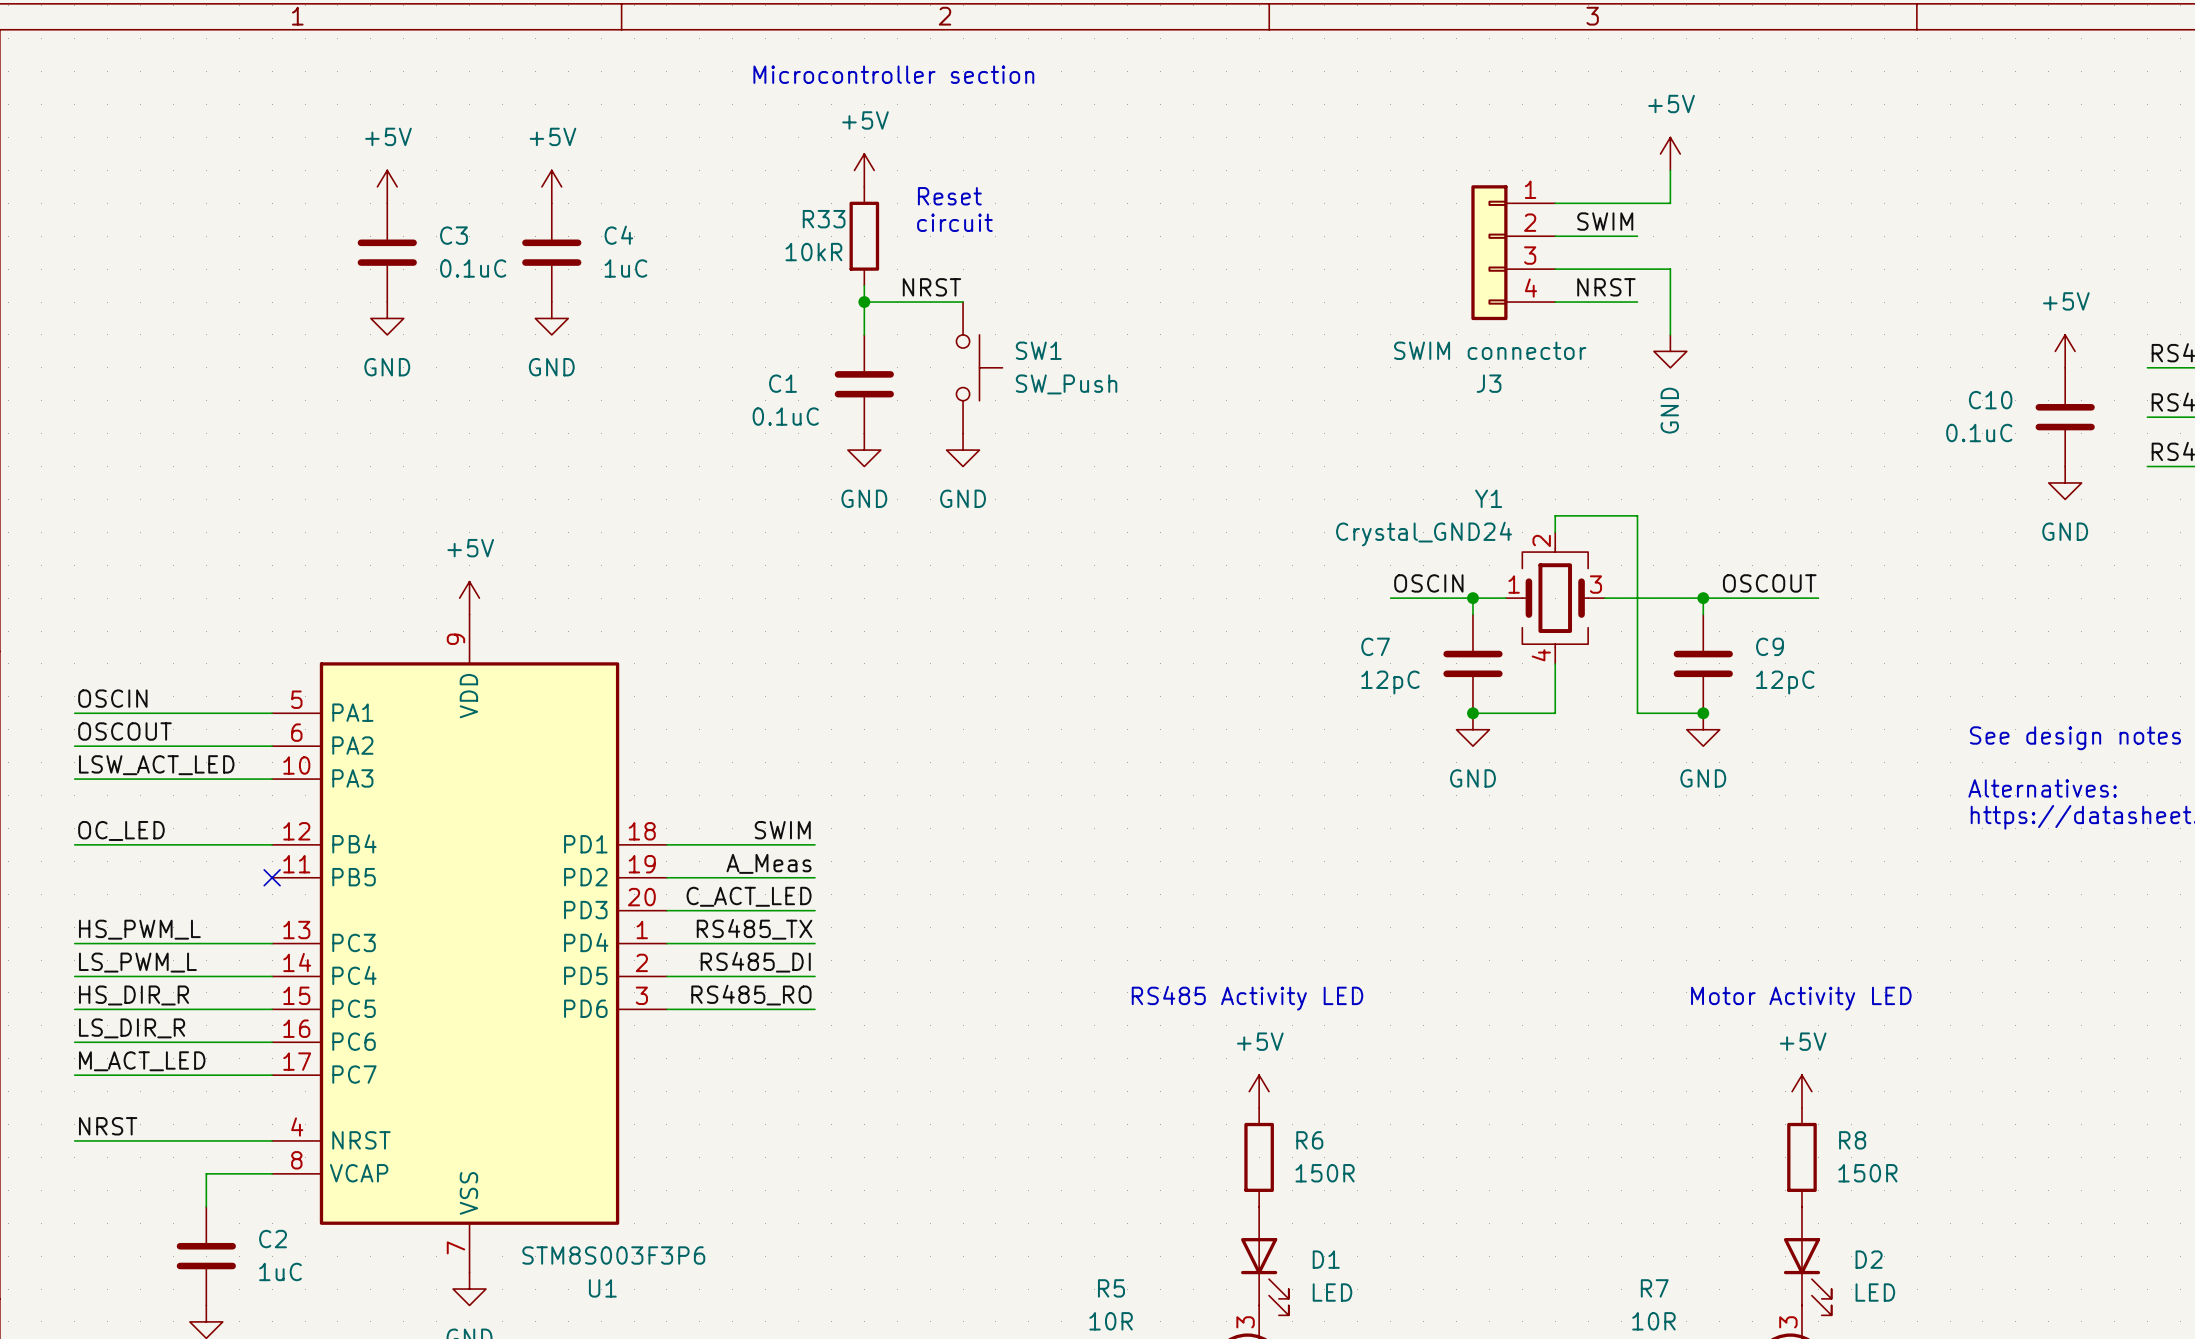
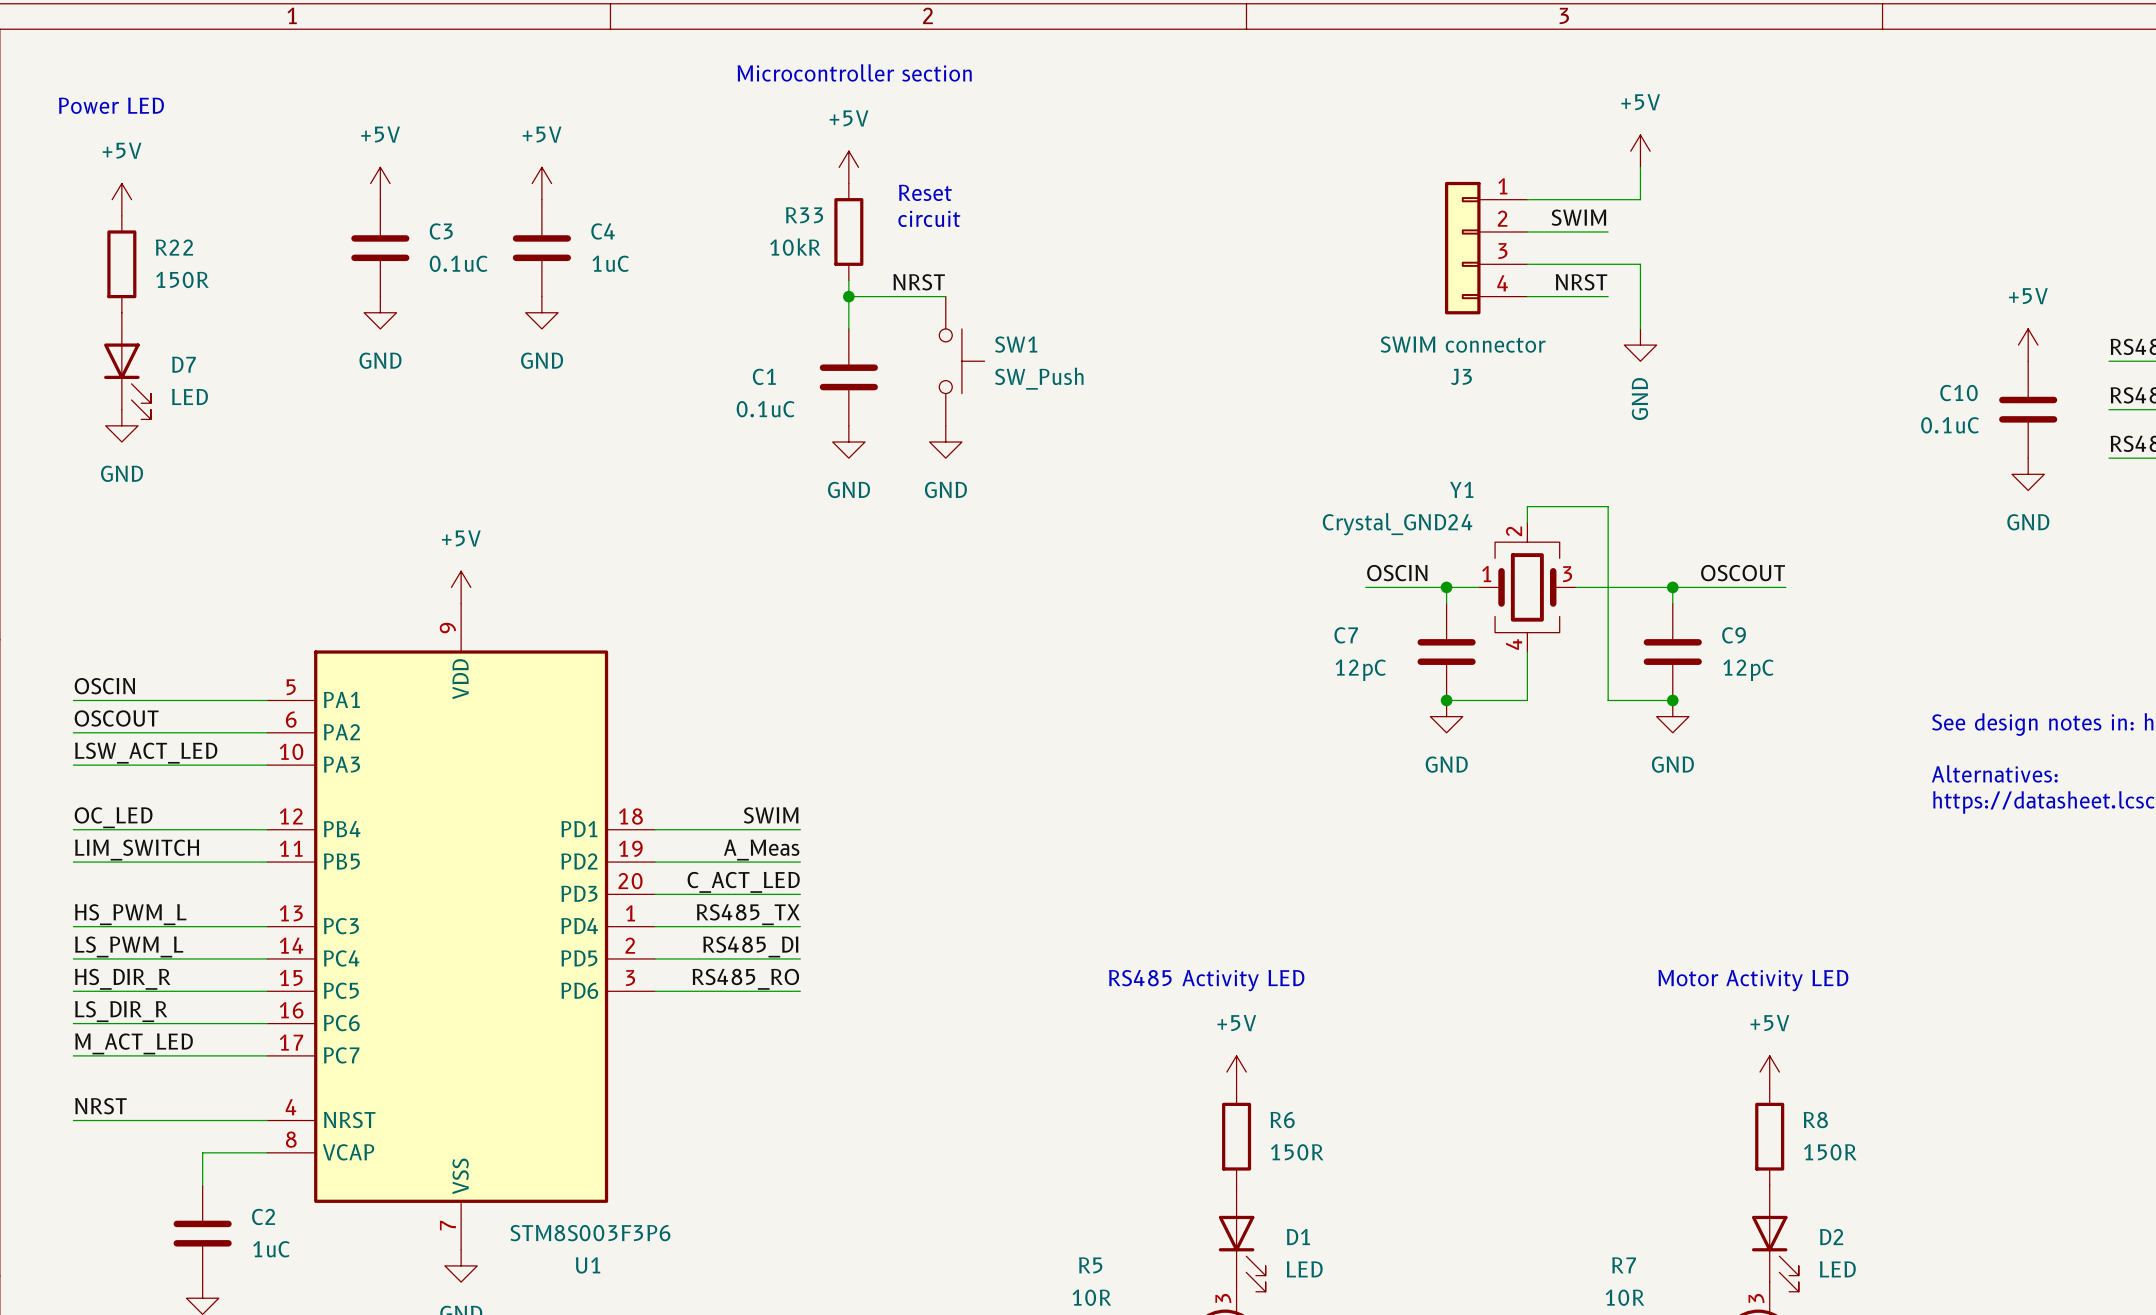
text: none -> Power LED (111, 105)
power symbol: none -> +5V (121, 199)
R22: none -> 150R (121, 264)
D7: none -> LED (127, 366)
power symbol: none -> GND (121, 425)
label: none -> LIM_SWITCH (137, 850)
wire: none -> (73, 862) (267, 862)
no-connect mark: (272, 877) -> none

